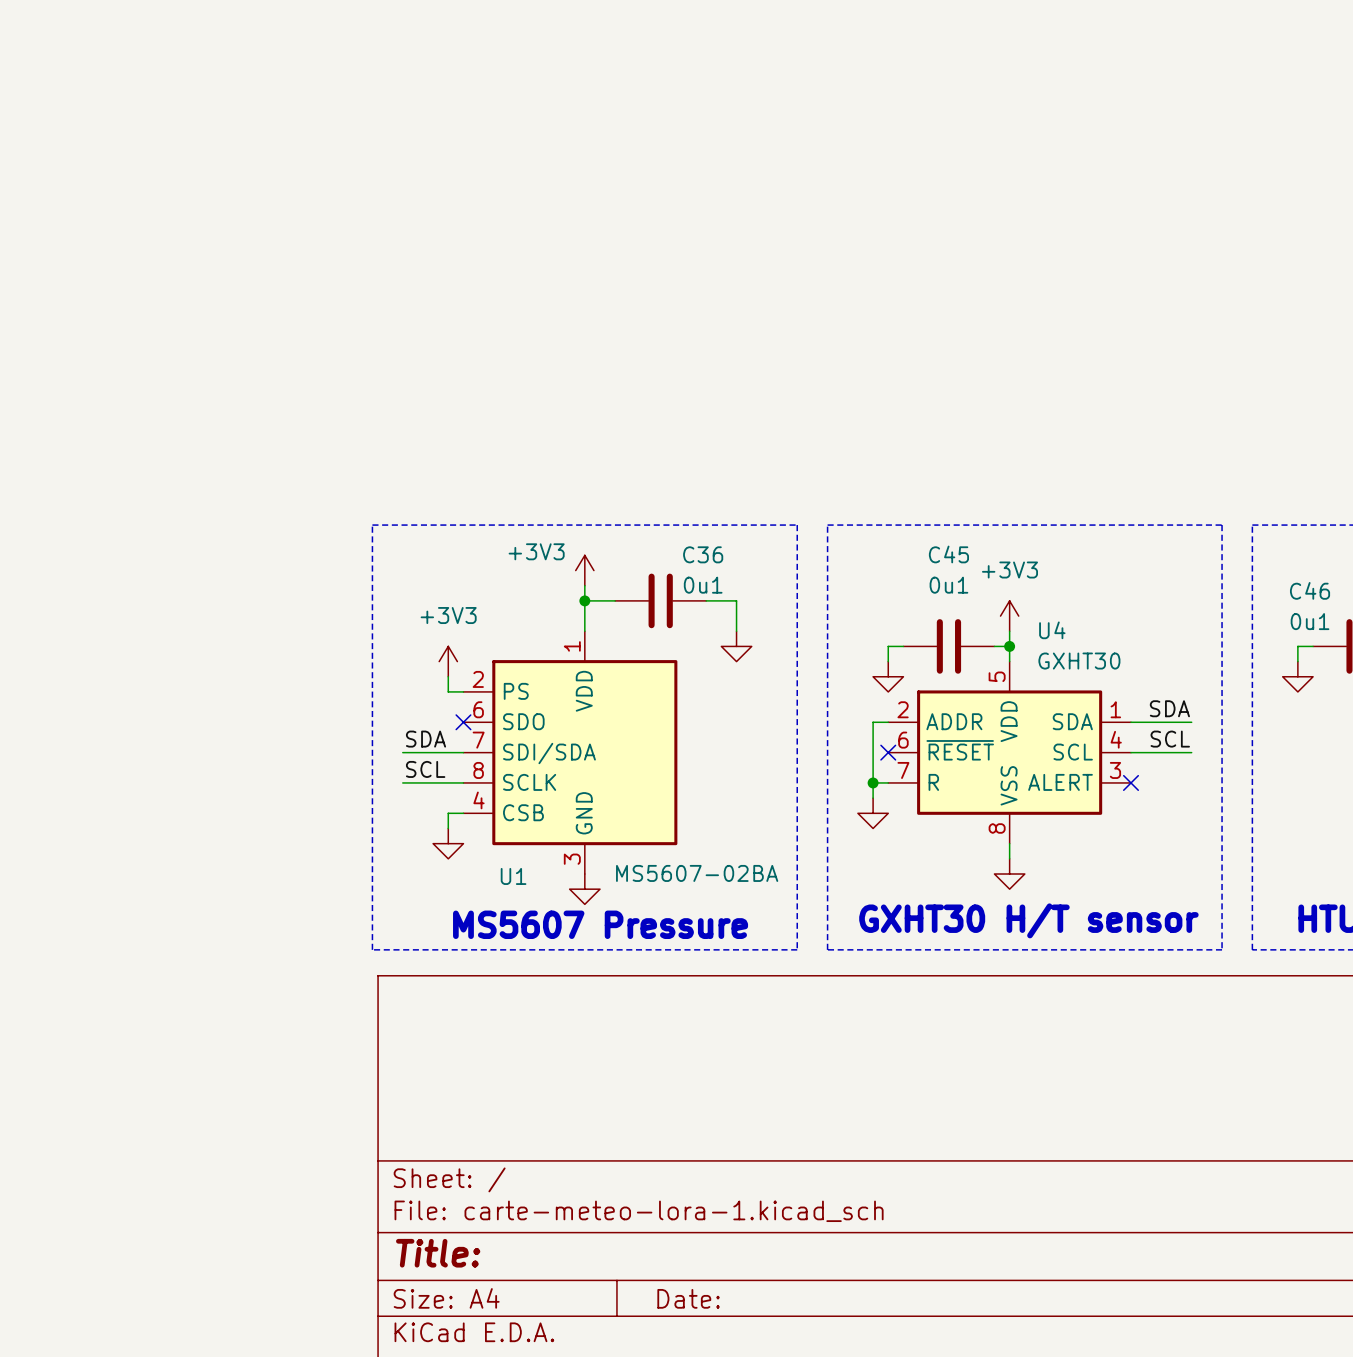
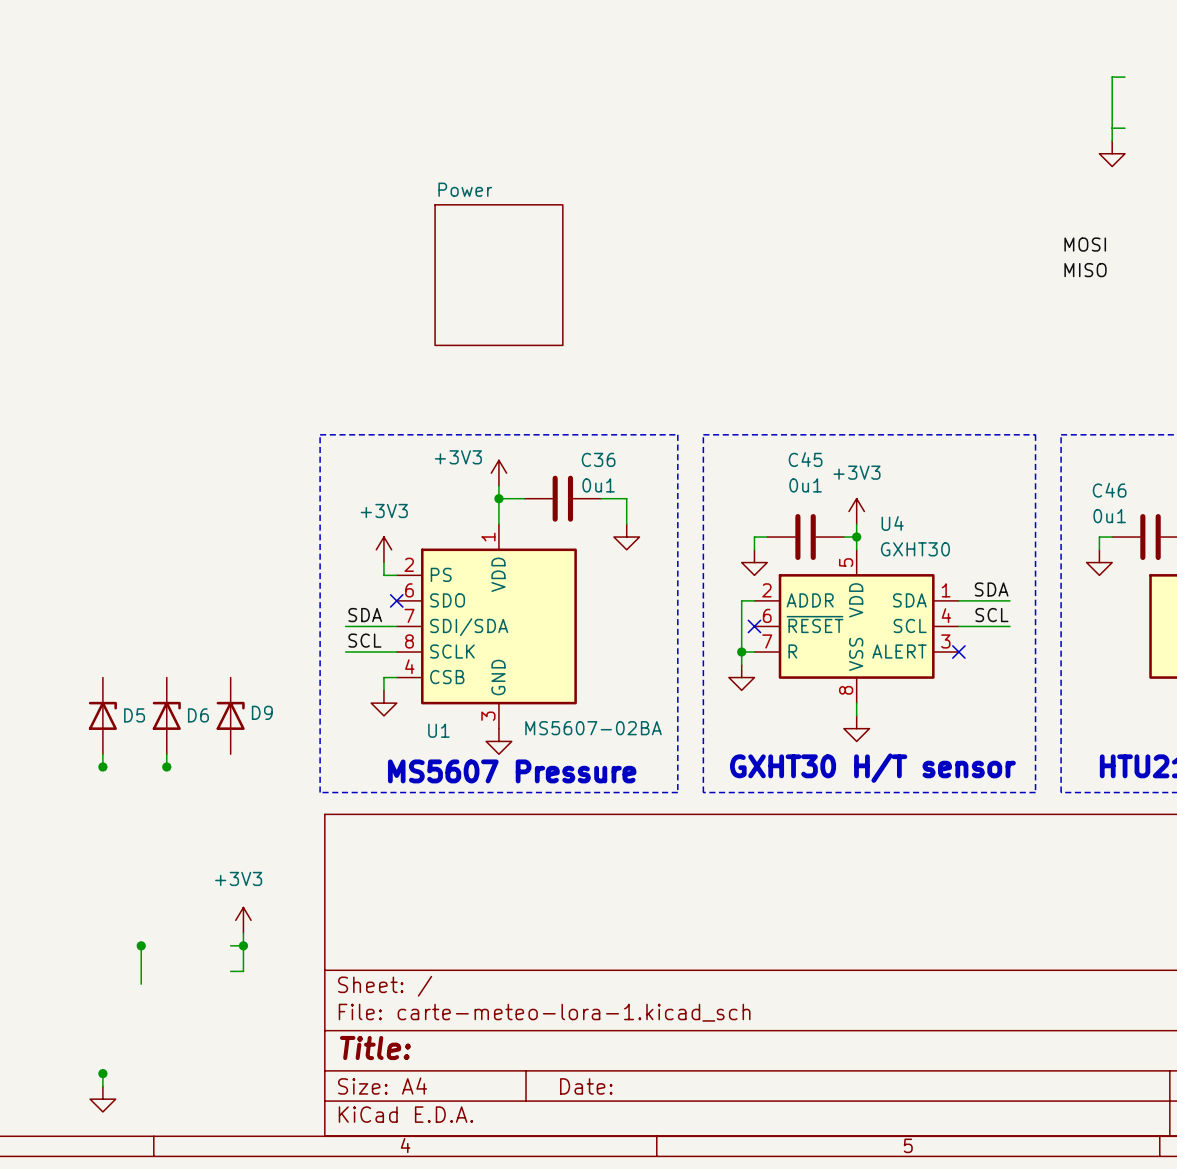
wire: none -> (1124, 77) (1112, 77) (1112, 140)
wire: none -> (1112, 128) (1124, 128)
power symbol: none -> (1112, 153)
label: none -> MOSI (1085, 244)
label: none -> MISO (1085, 270)
sheet Power: none -> (498, 275)
D5: none -> (102, 715)
D6: none -> (166, 715)
D9: none -> (230, 715)
wire: none -> (102, 754) (102, 766)
wire: none -> (166, 754) (166, 766)
junction: none -> (102, 766)
junction: none -> (166, 766)
power symbol: none -> +3V3 (243, 920)
wire: none -> (243, 933) (243, 971) (230, 971)
wire: none -> (141, 945) (141, 984)
junction: none -> (141, 945)
wire: none -> (230, 945) (243, 945)
junction: none -> (243, 945)
wire: none -> (102, 1073) (102, 1086)
junction: none -> (102, 1073)
power symbol: none -> (102, 1099)

